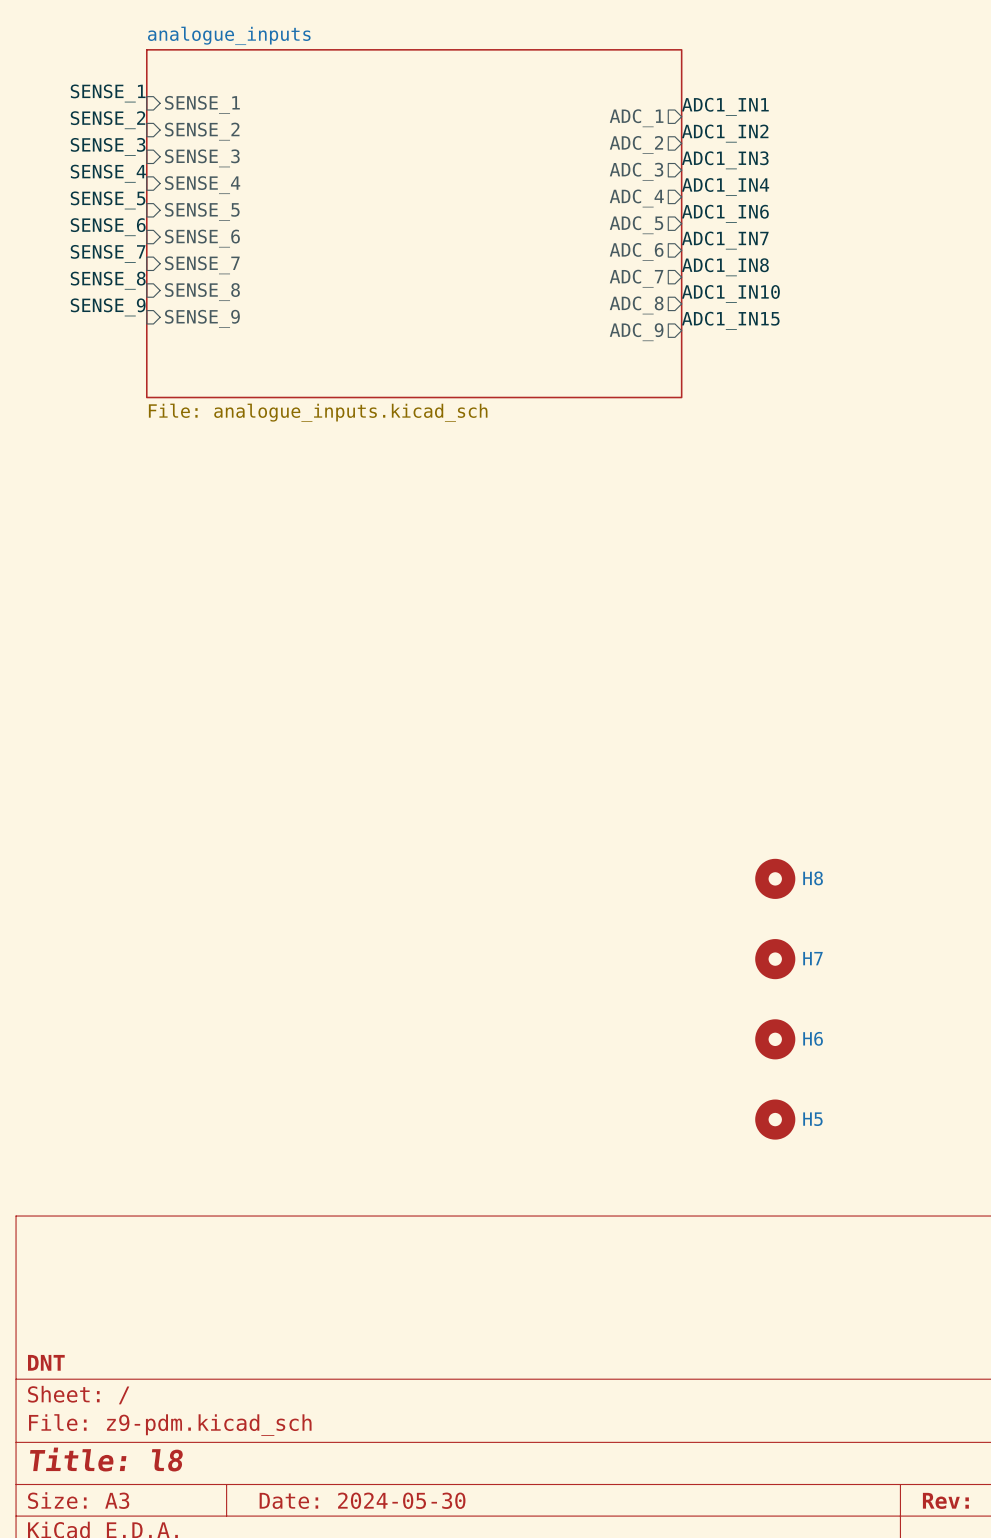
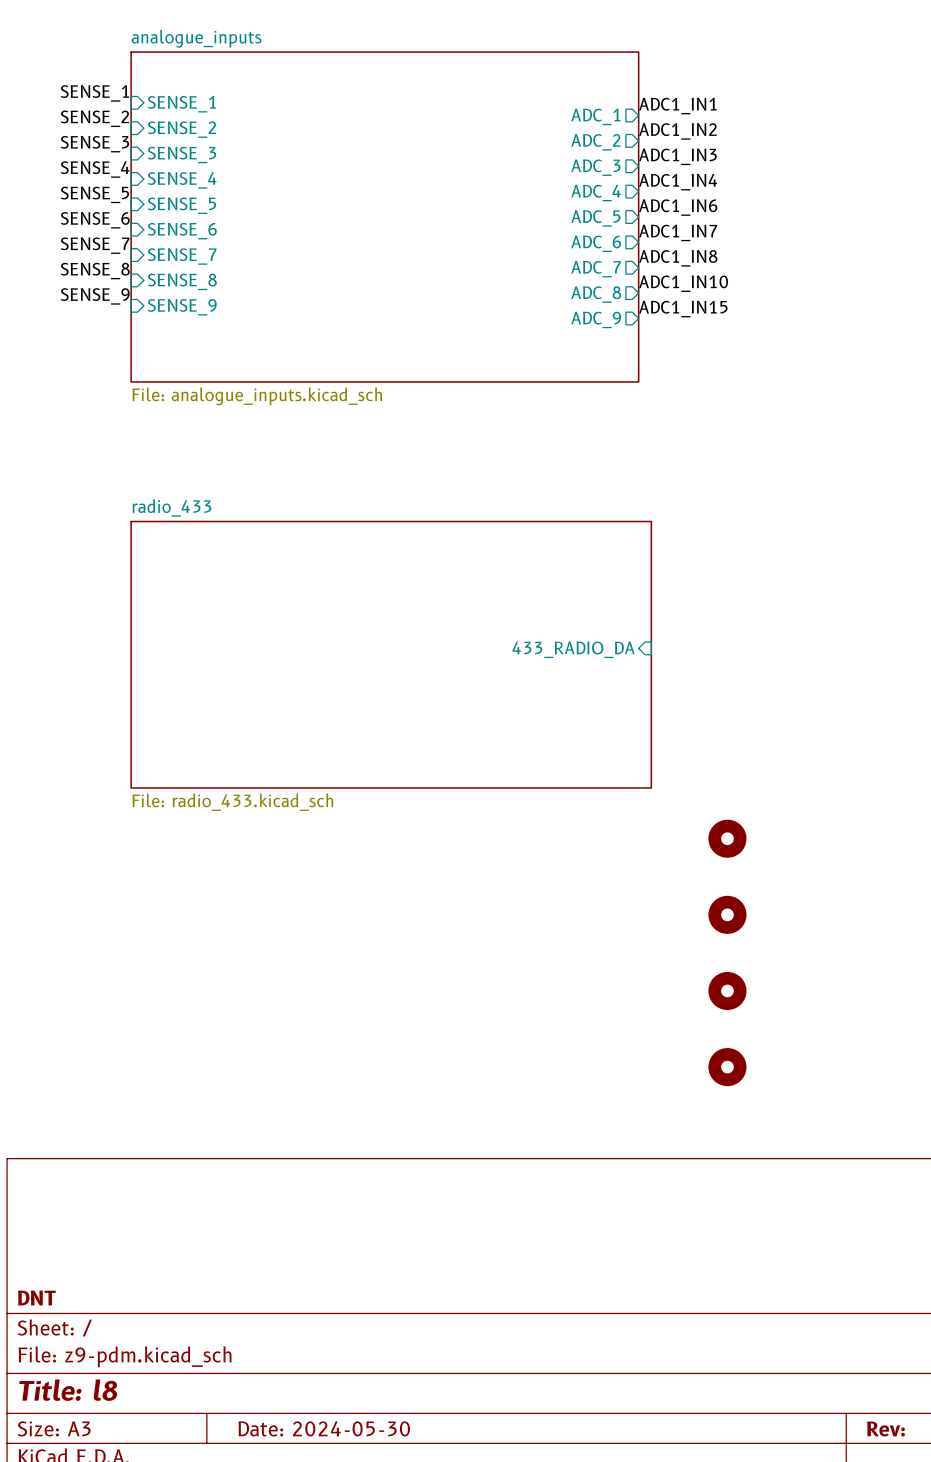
sheet pin: none -> 433_RADIO_DA (573, 649)
sheet radio_433: none -> File: radio_433.kicad_sch (391, 654)
H8 name: H8 (813, 878) -> none
H7 name: H7 (812, 958) -> none
H6 name: H6 (813, 1038) -> none
H5 name: H5 (812, 1119) -> none

